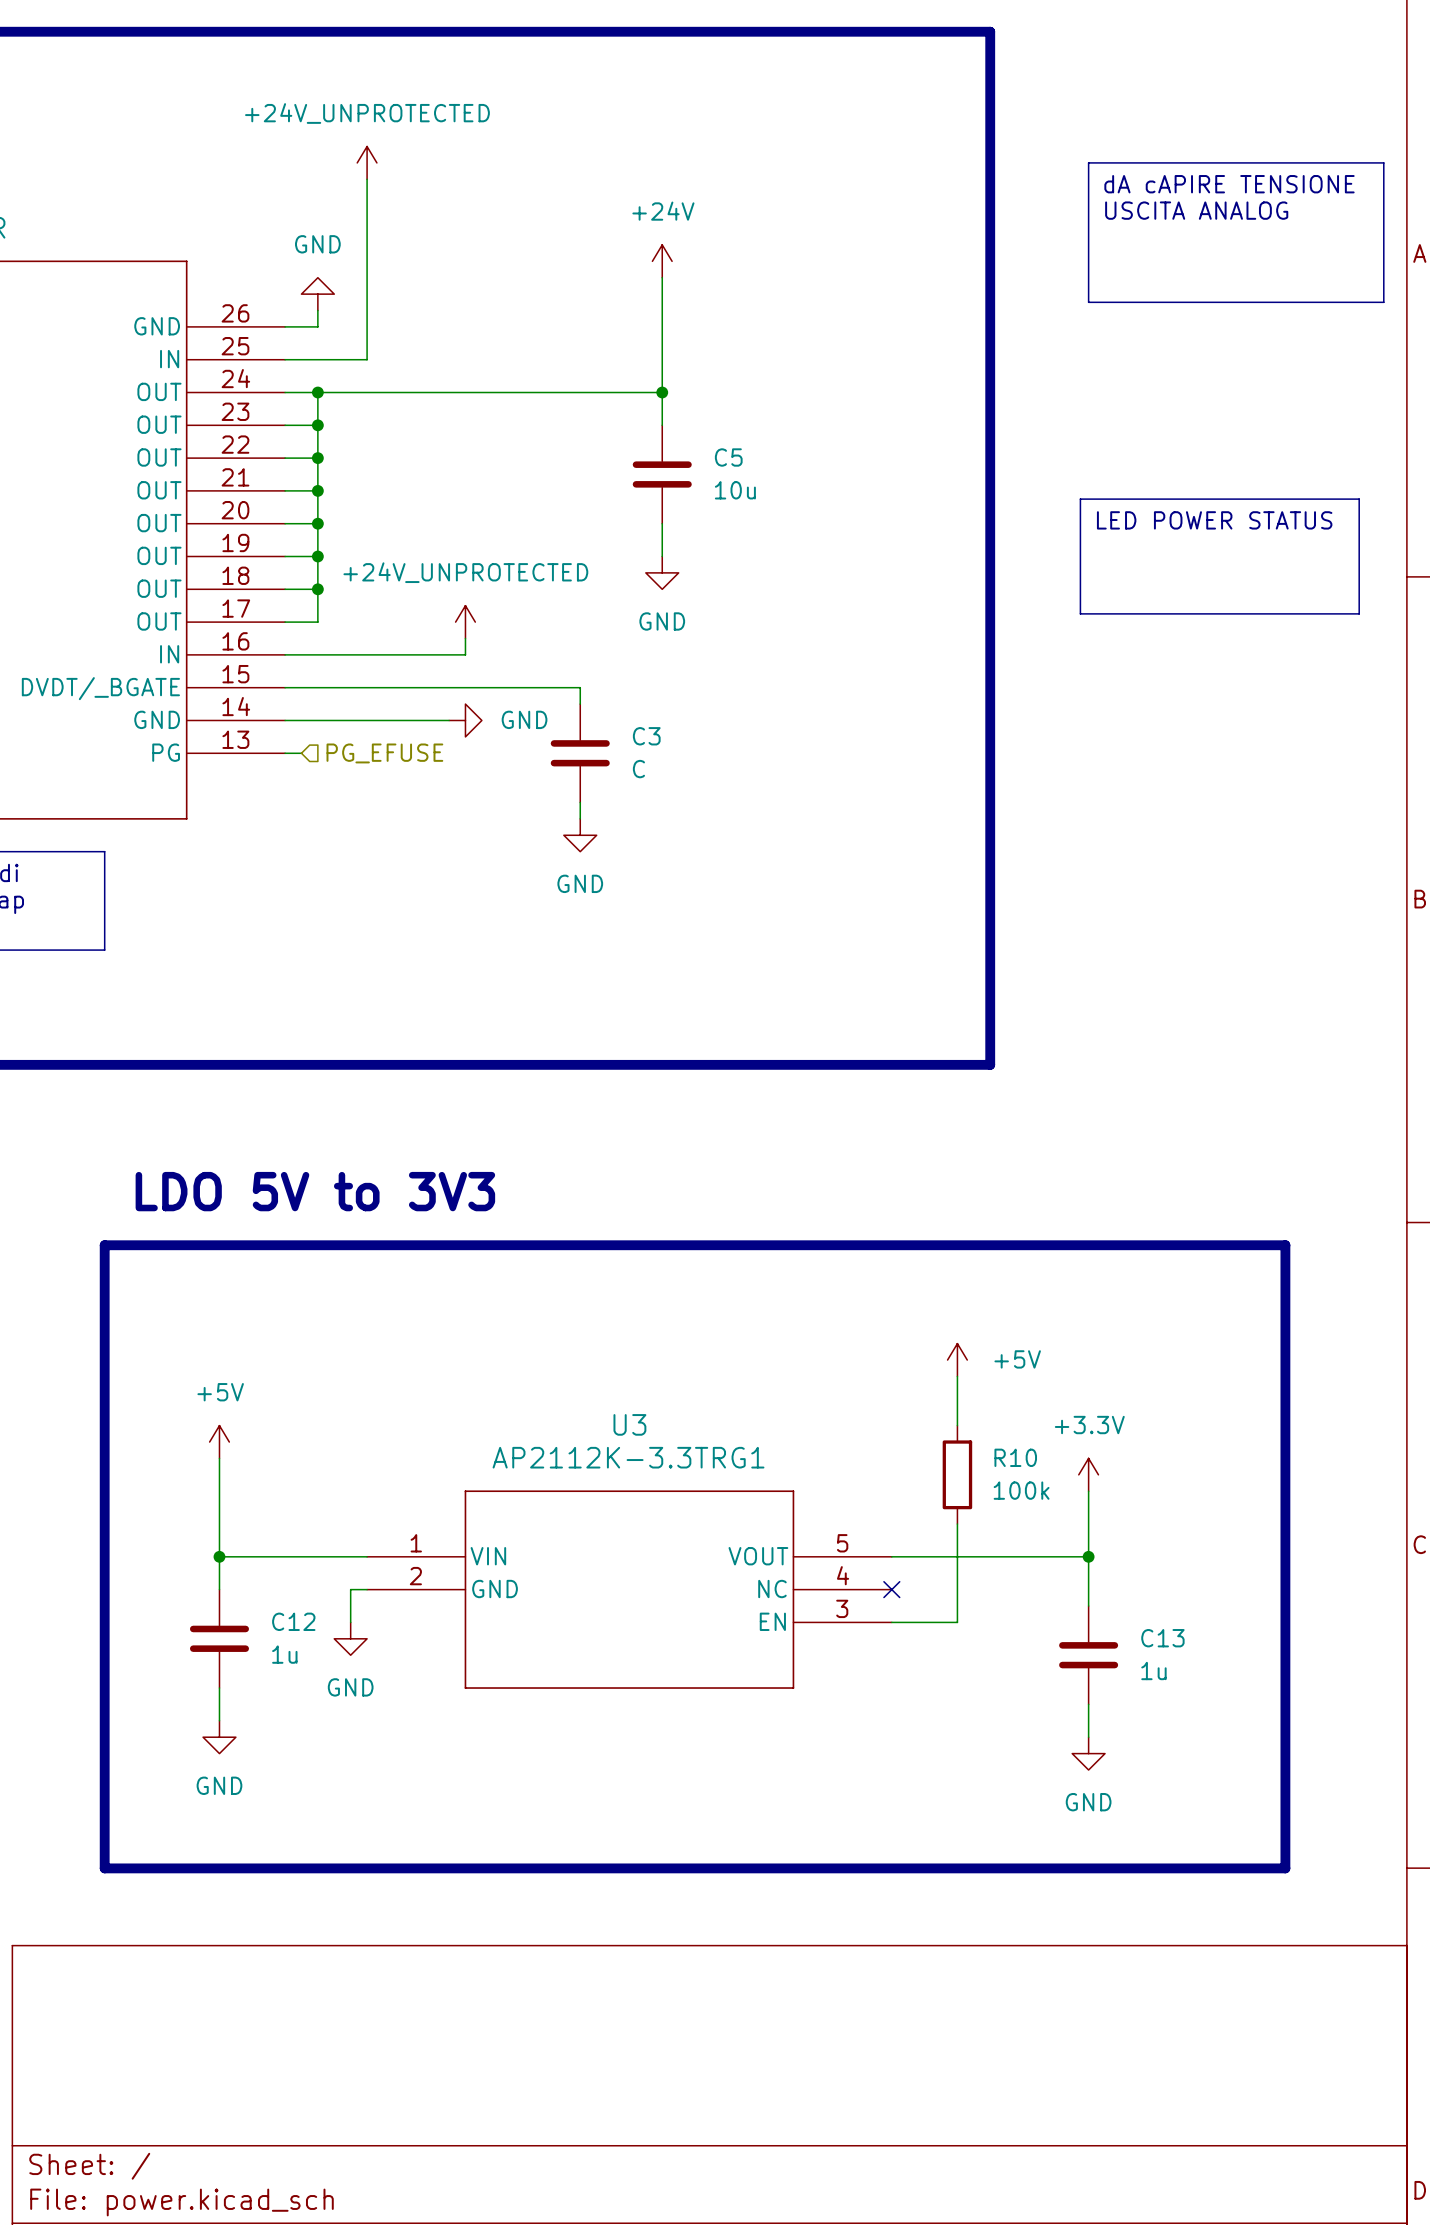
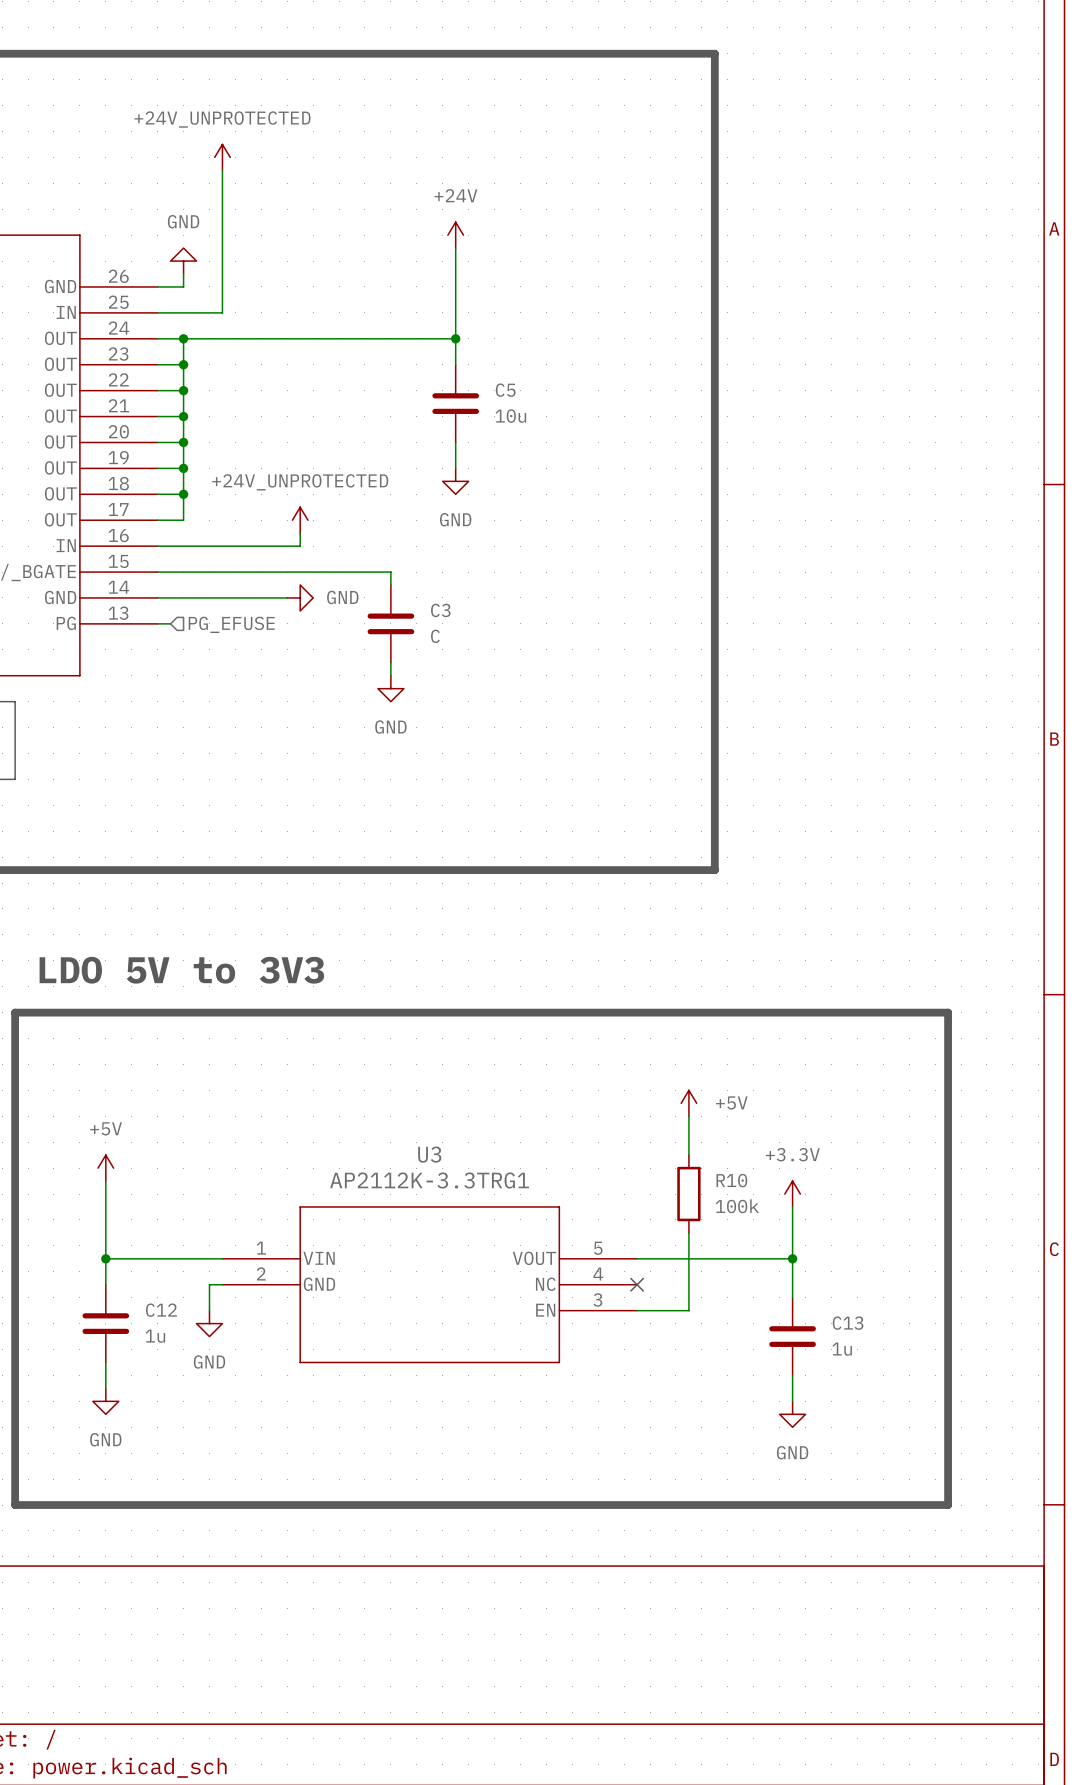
line: (1088, 162) (1383, 162) (1383, 302) (1088, 302) (1088, 162) -> none
text: dA cAPIRE TENSIONE (1229, 184) -> none
text: USCITA ANALOG (1196, 210) -> none
line: (1080, 499) (1359, 499) (1359, 613) (1080, 613) (1080, 499) -> none
text: LED POWER STATUS (1214, 520) -> none

